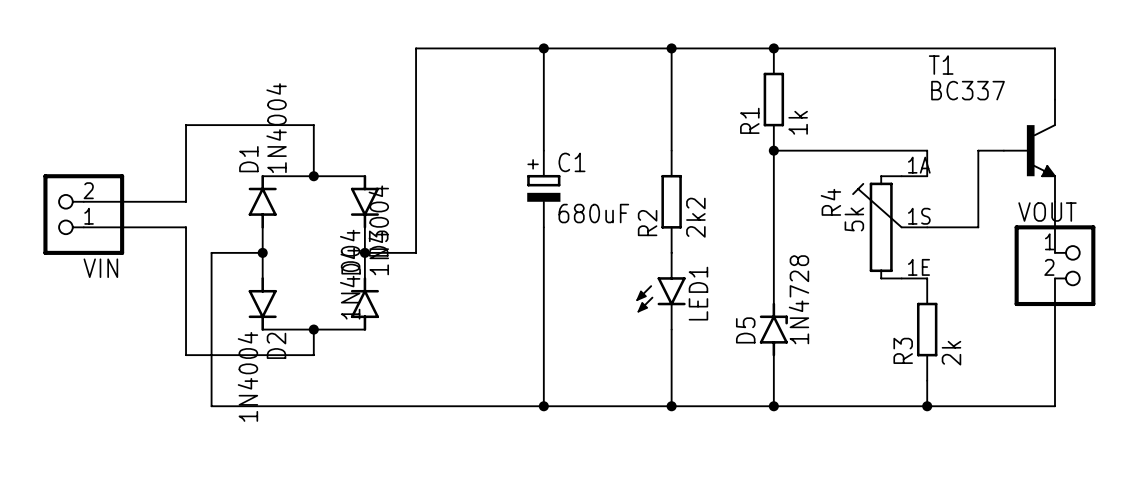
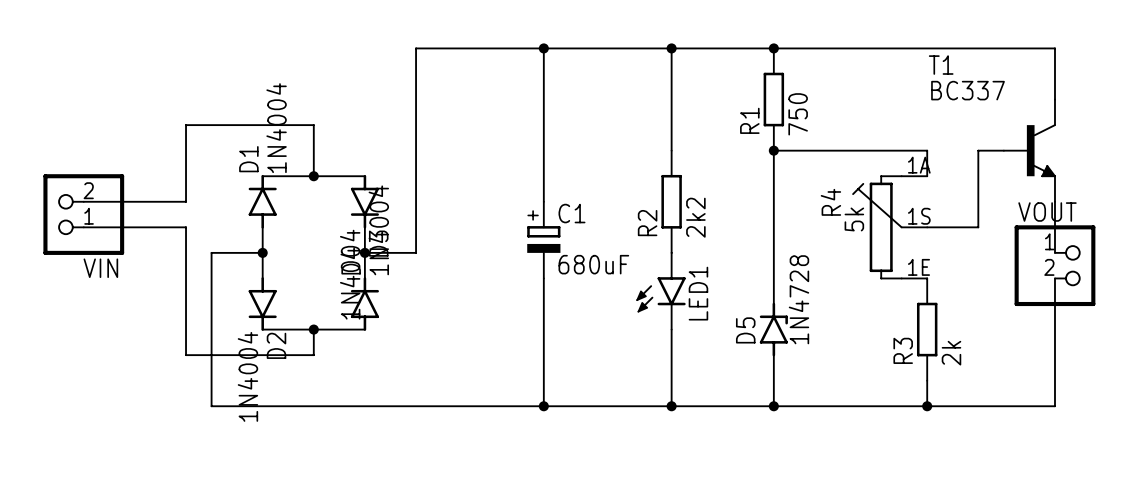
R1 value: 1k (798, 122) -> 750 (798, 114)
C1 position: (543, 189) -> (543, 240)

